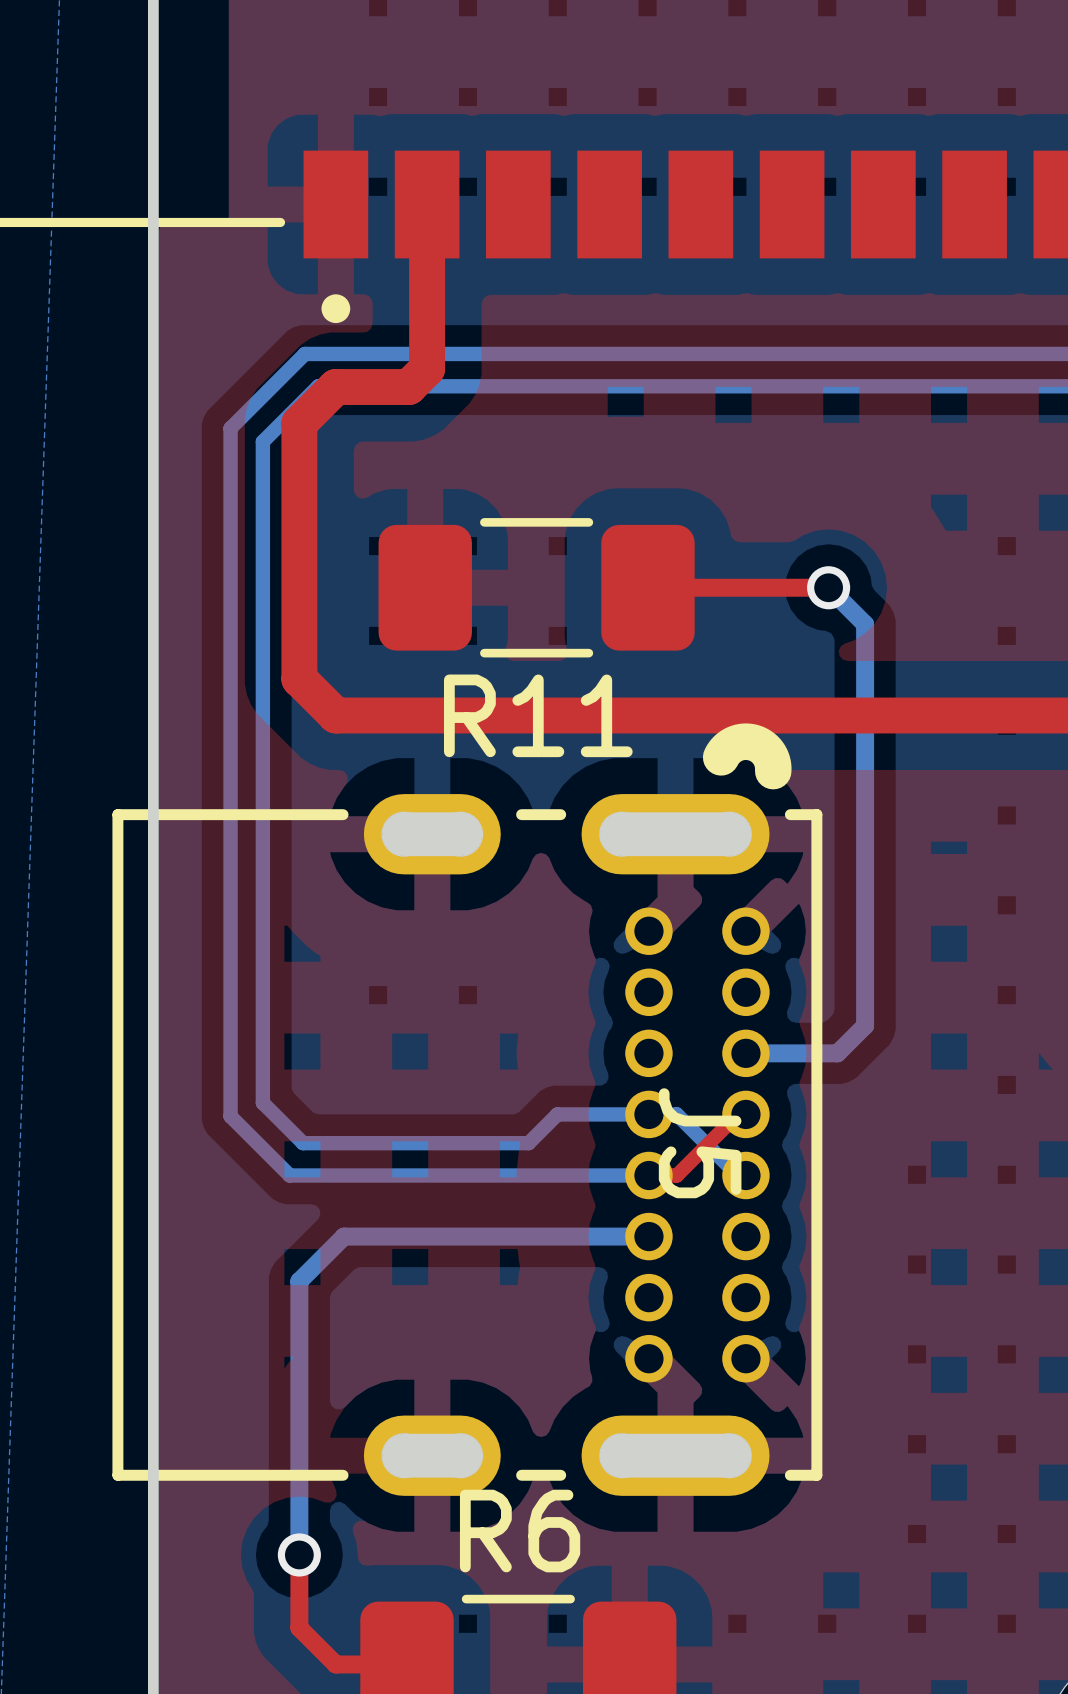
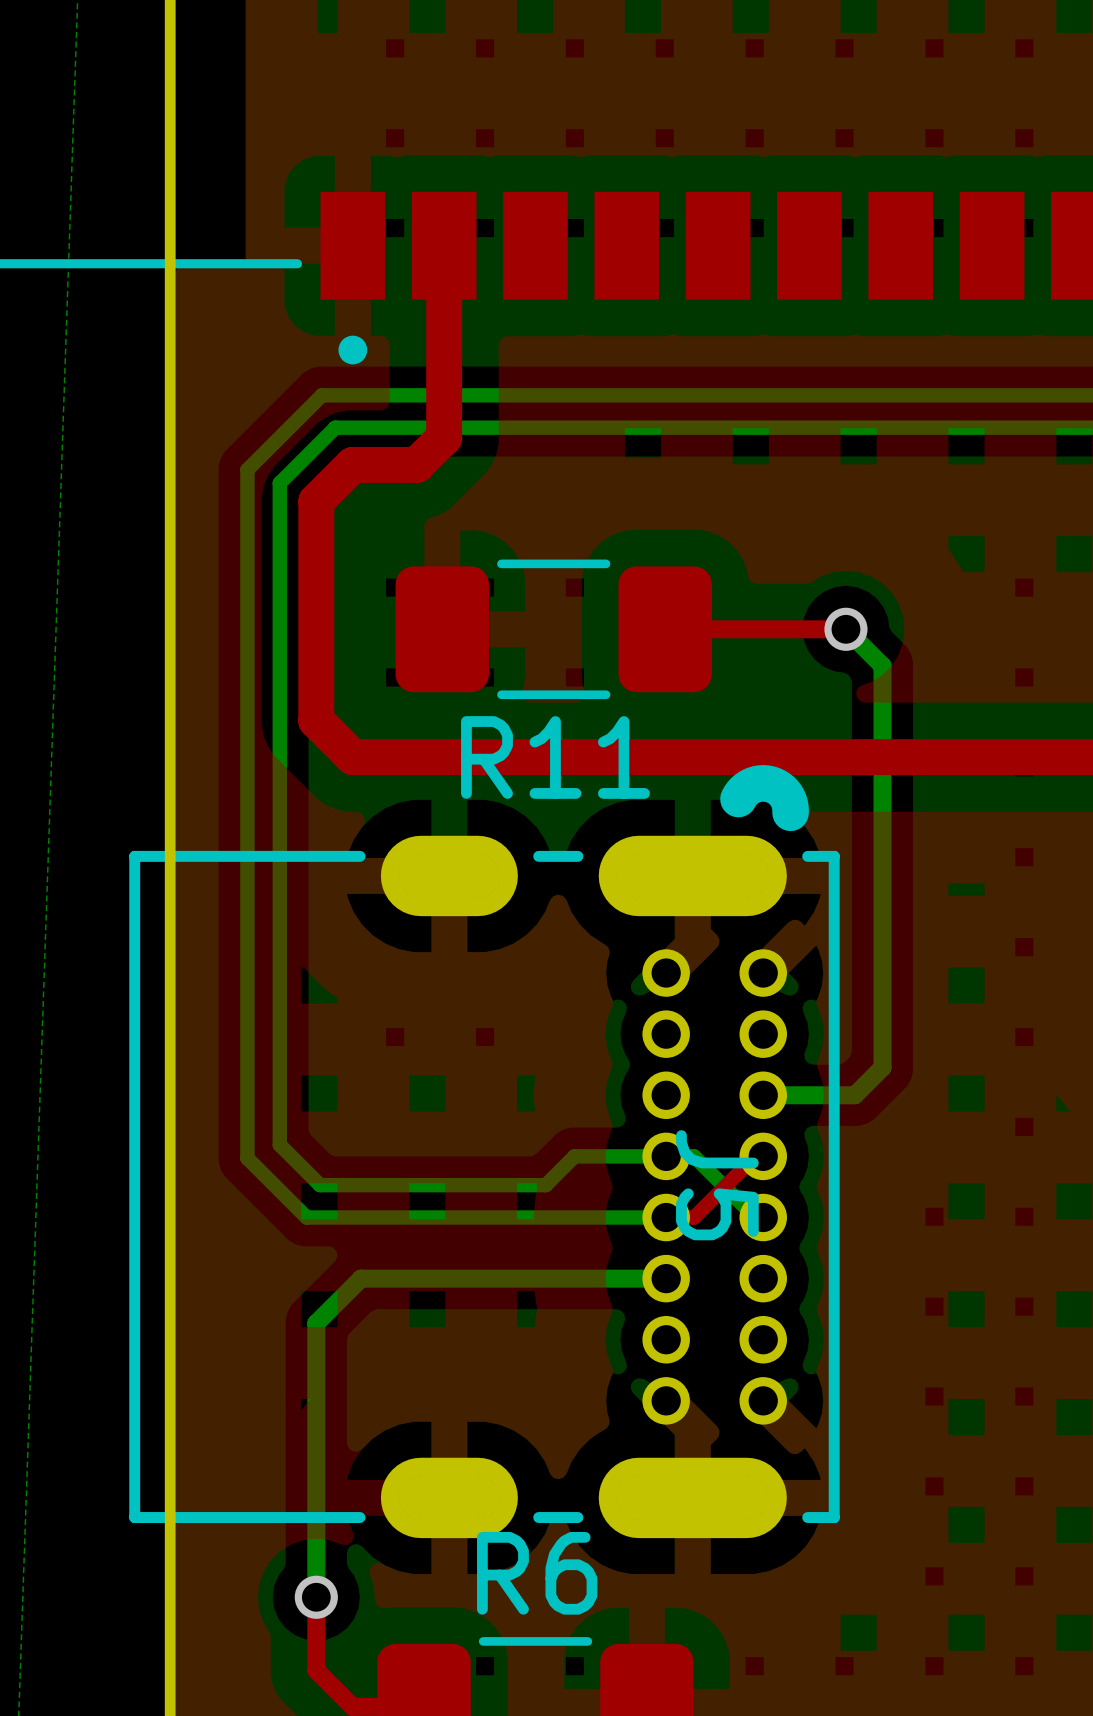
top track: (427, 368) (408, 387) (335, 387) (299, 423) (299, 460) -> (444, 410) (444, 437) (416, 464) (352, 464) (316, 501)

